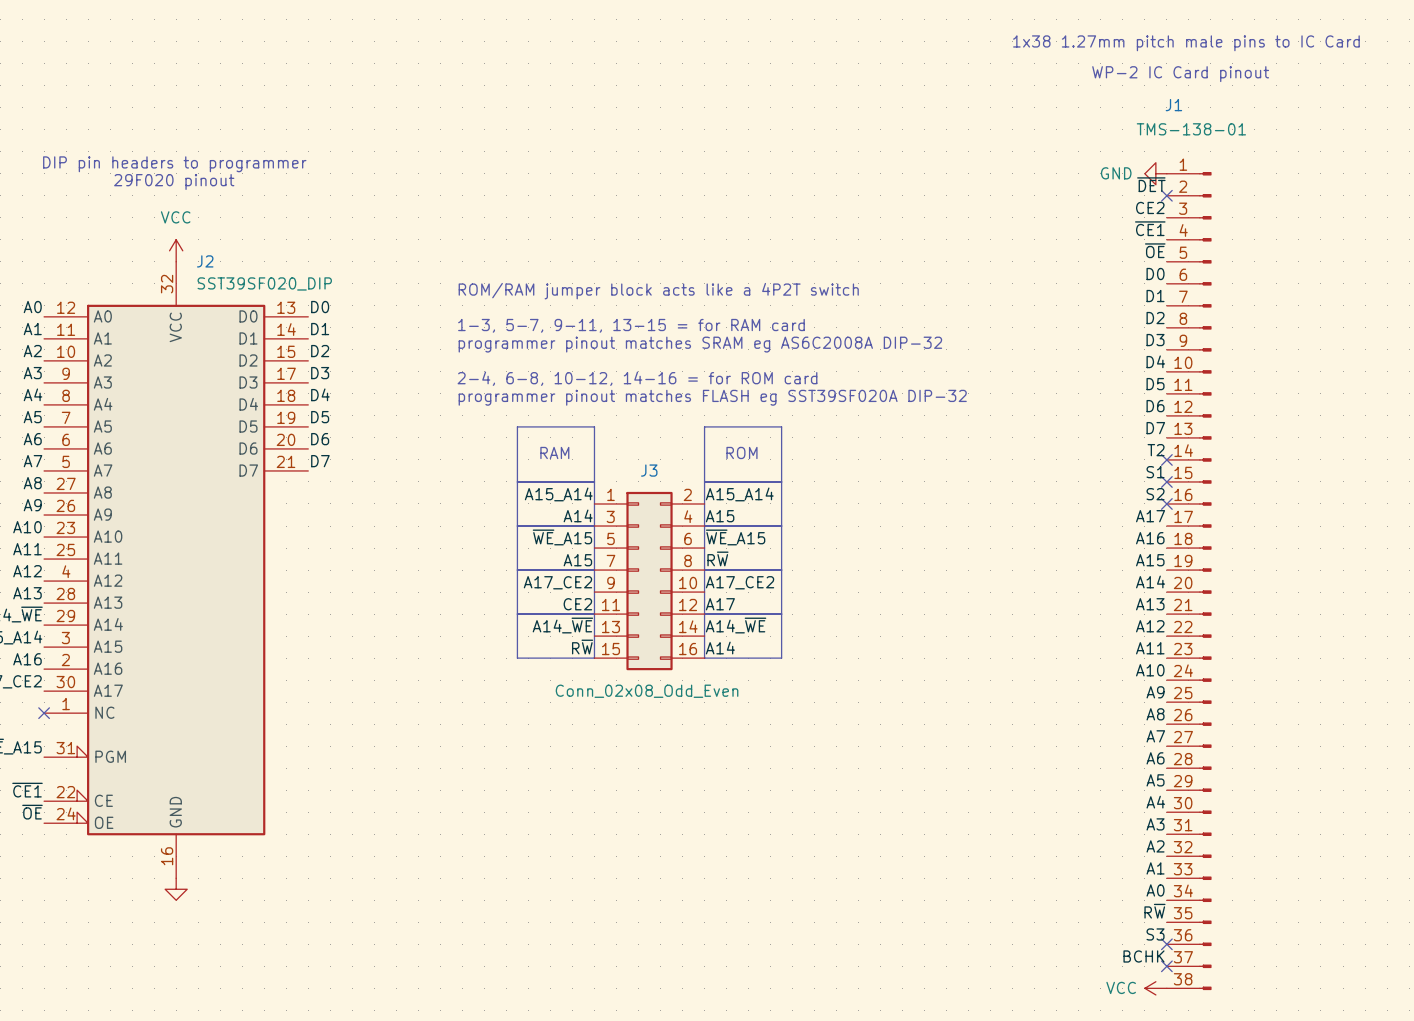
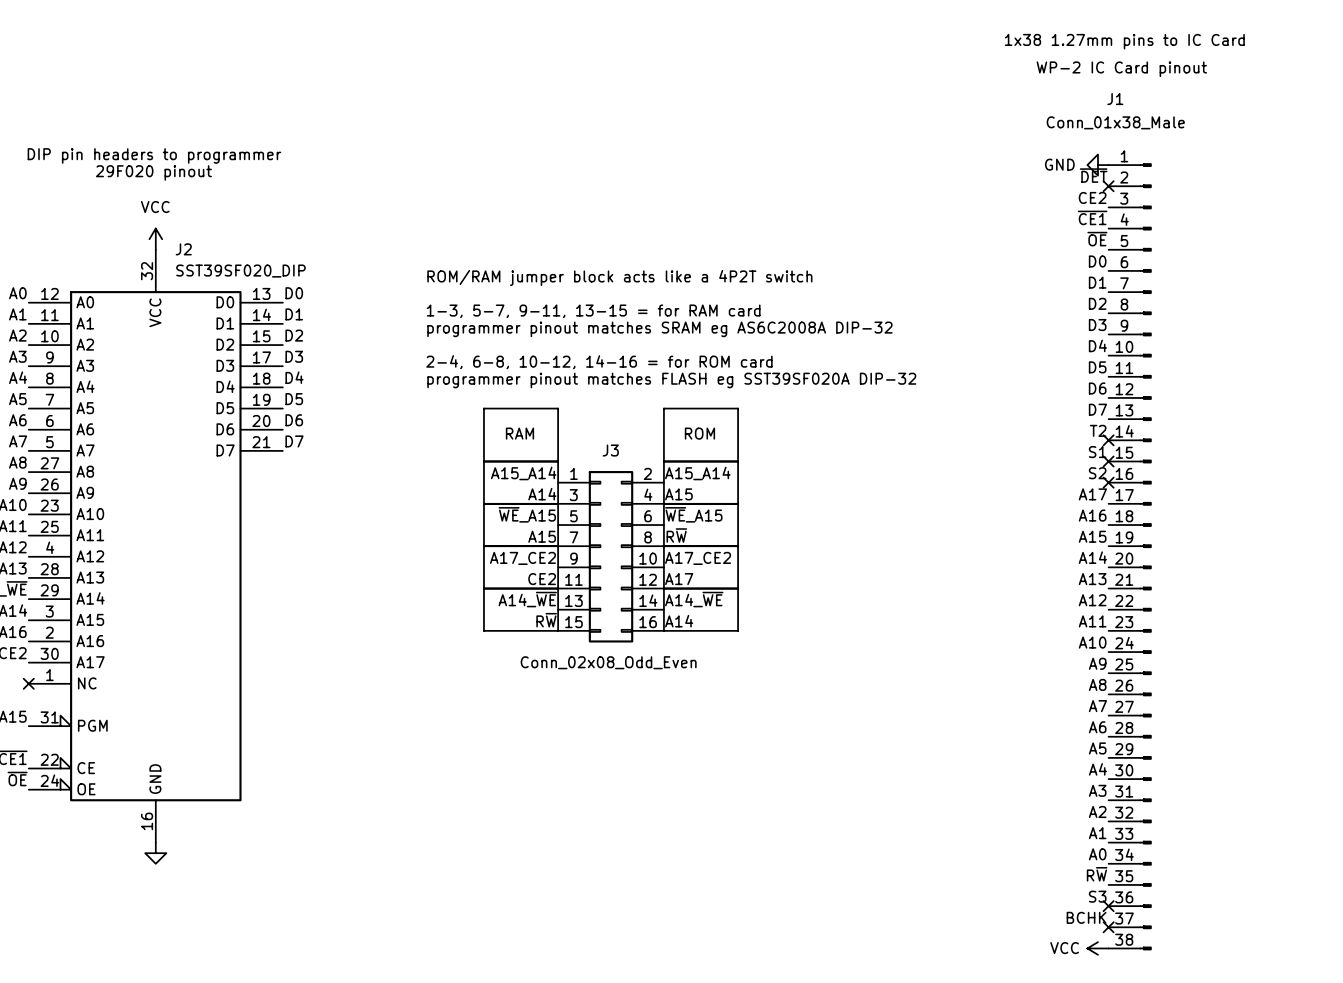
text: 1x38 1.27mm pitch male pins to IC Card (1186, 43) -> 1x38 1.27mm pins to IC Card (1124, 41)
J1 value: TMS-138-01 (1191, 129) -> Conn_01x38_Male (1115, 122)

